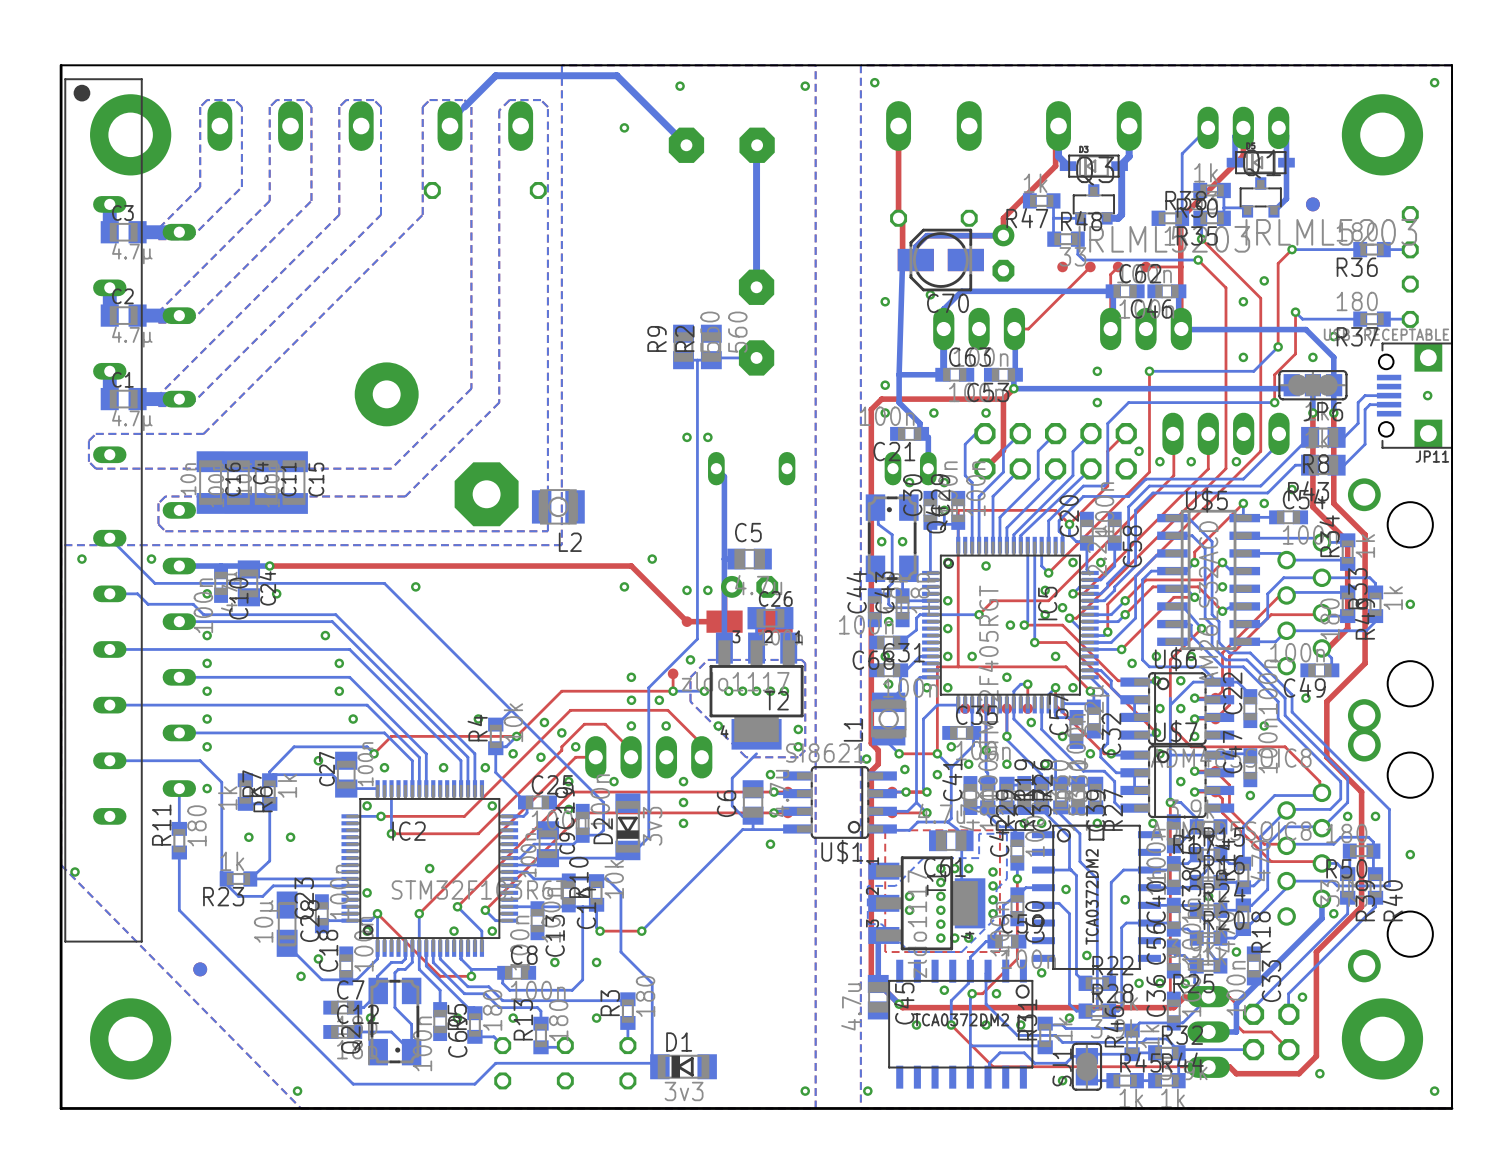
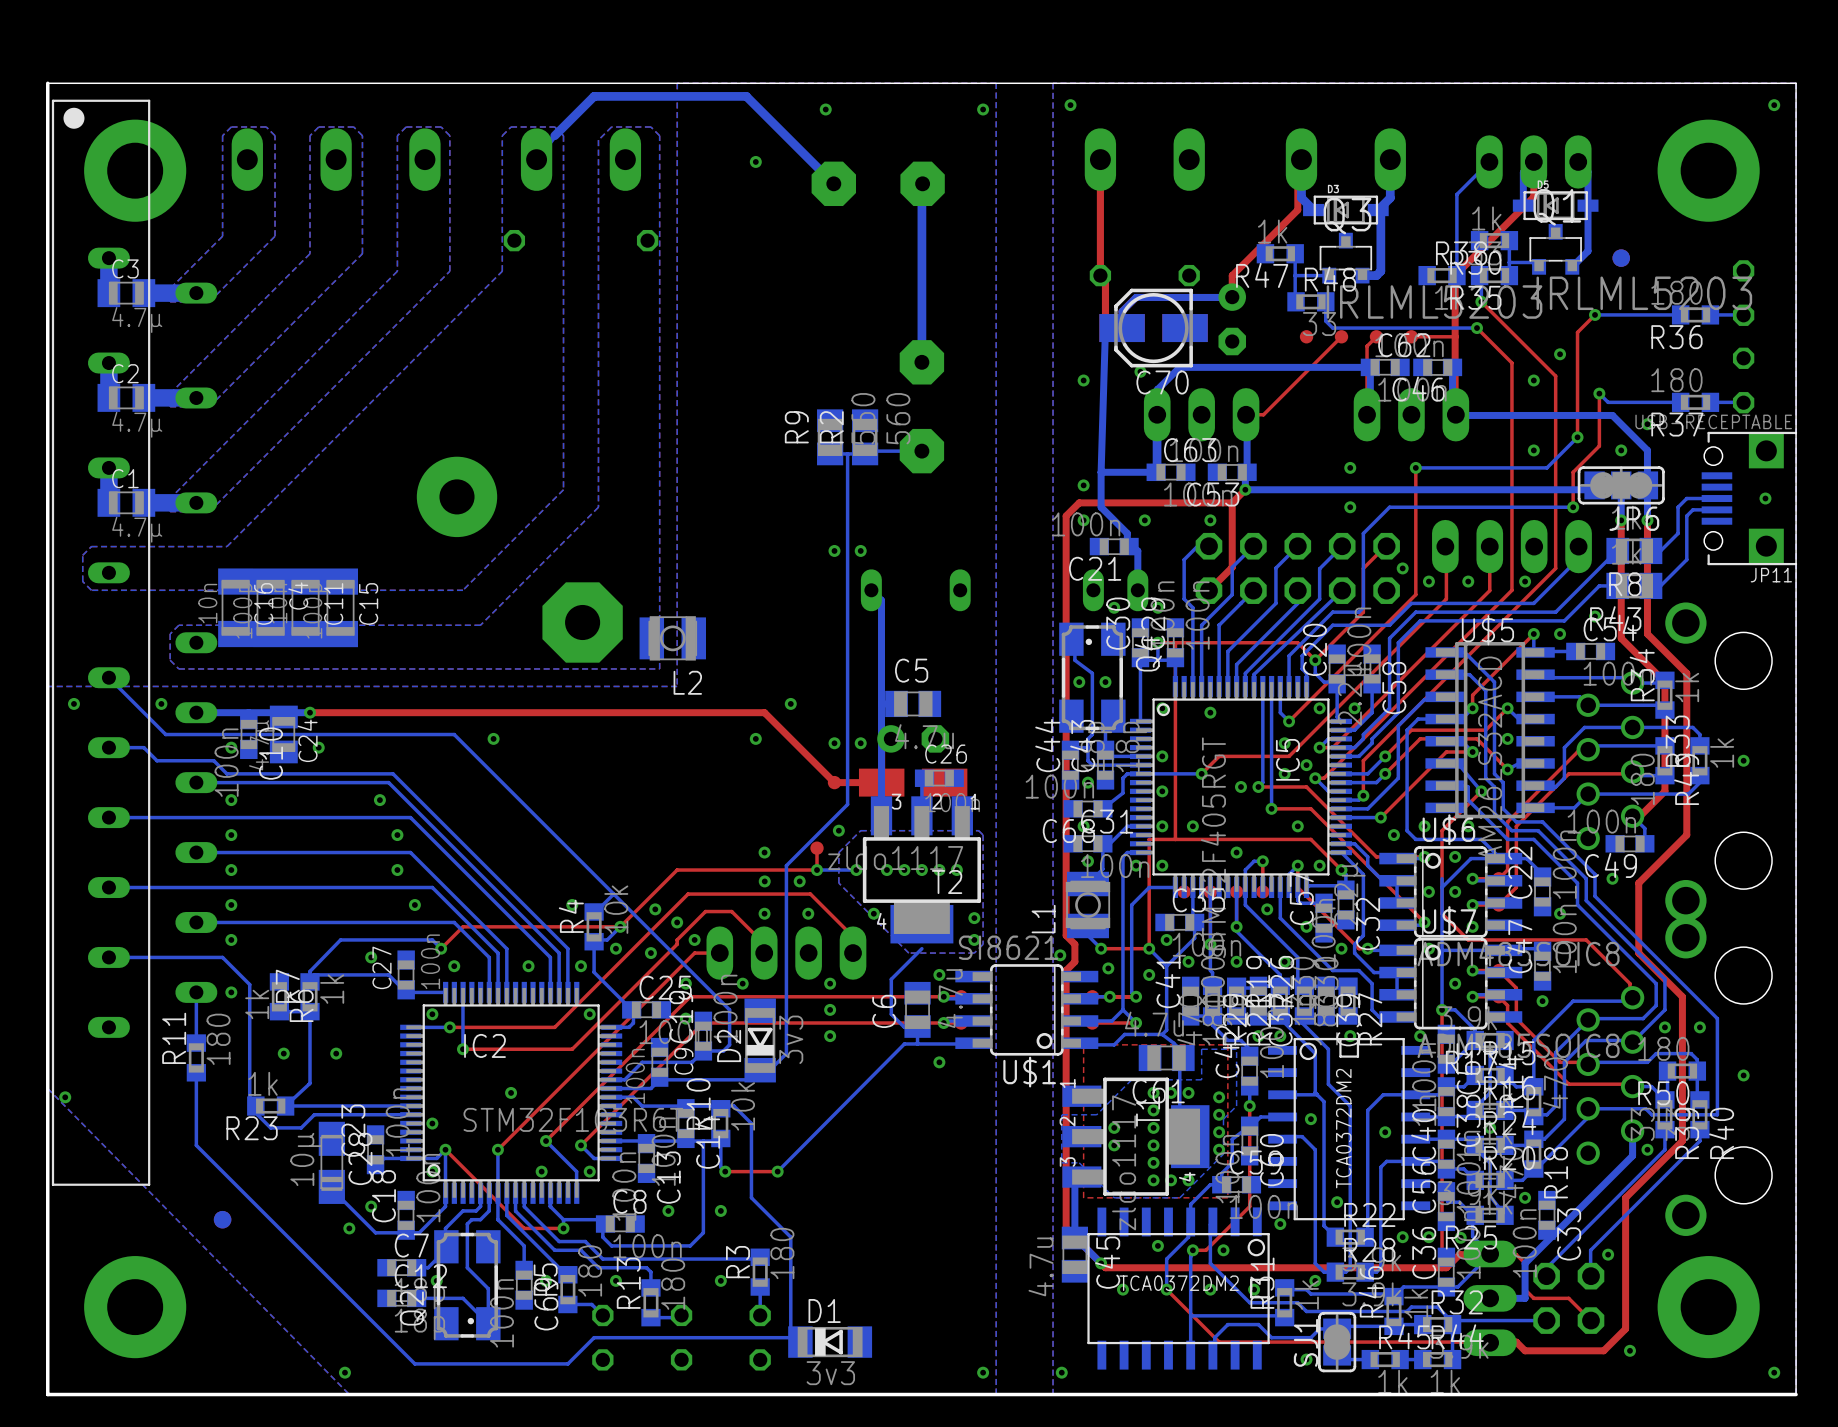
C26 footprint: [747, 607, 794, 630] -> [914, 769, 964, 787]
C27 footprint: [335, 751, 358, 798] -> [397, 950, 415, 1000]
C9 footprint: [536, 821, 560, 868] -> [650, 1037, 669, 1087]

